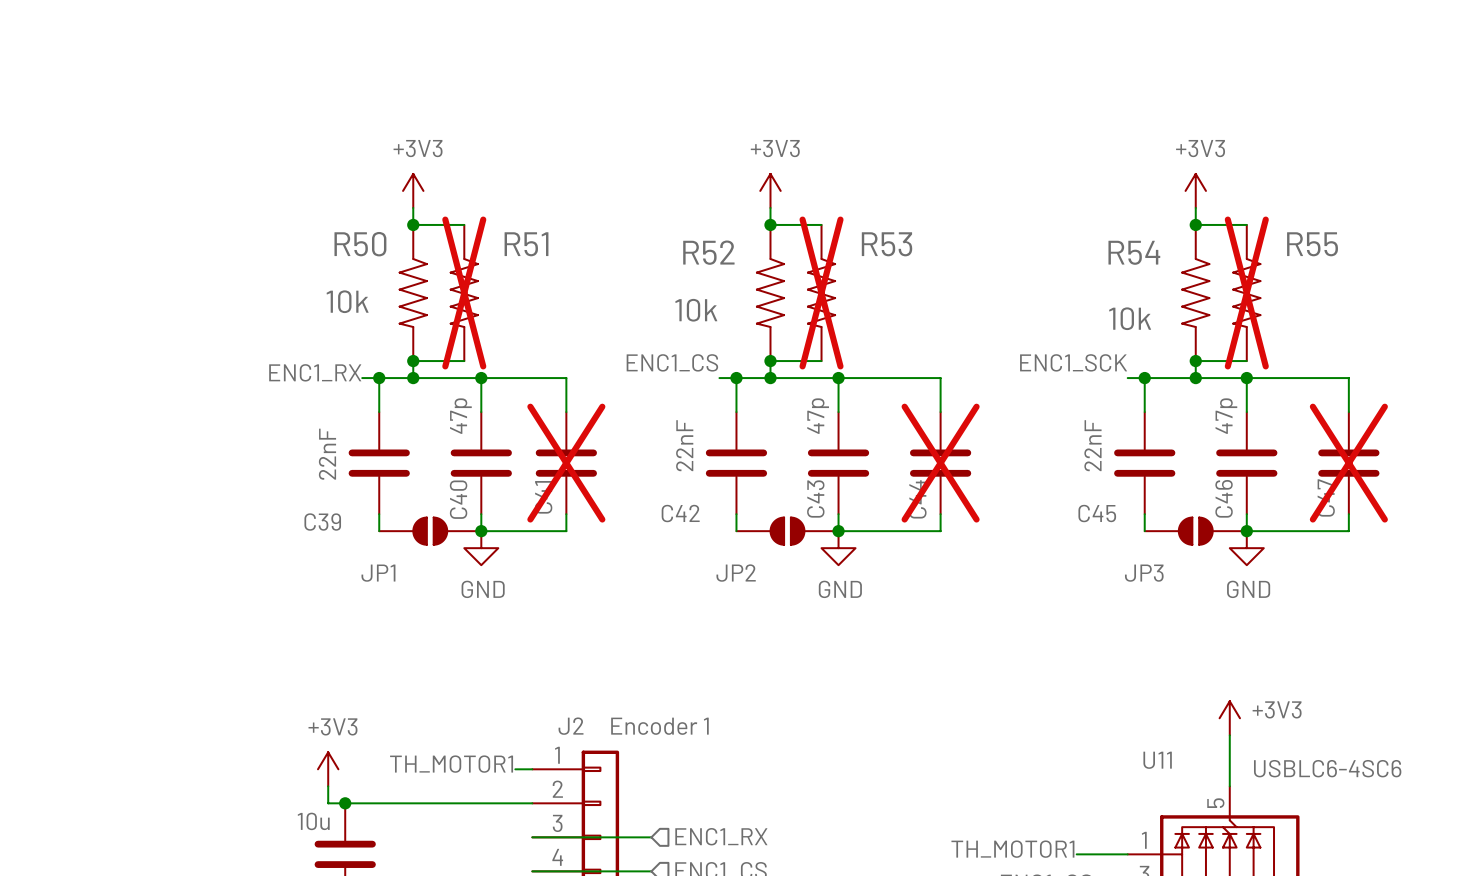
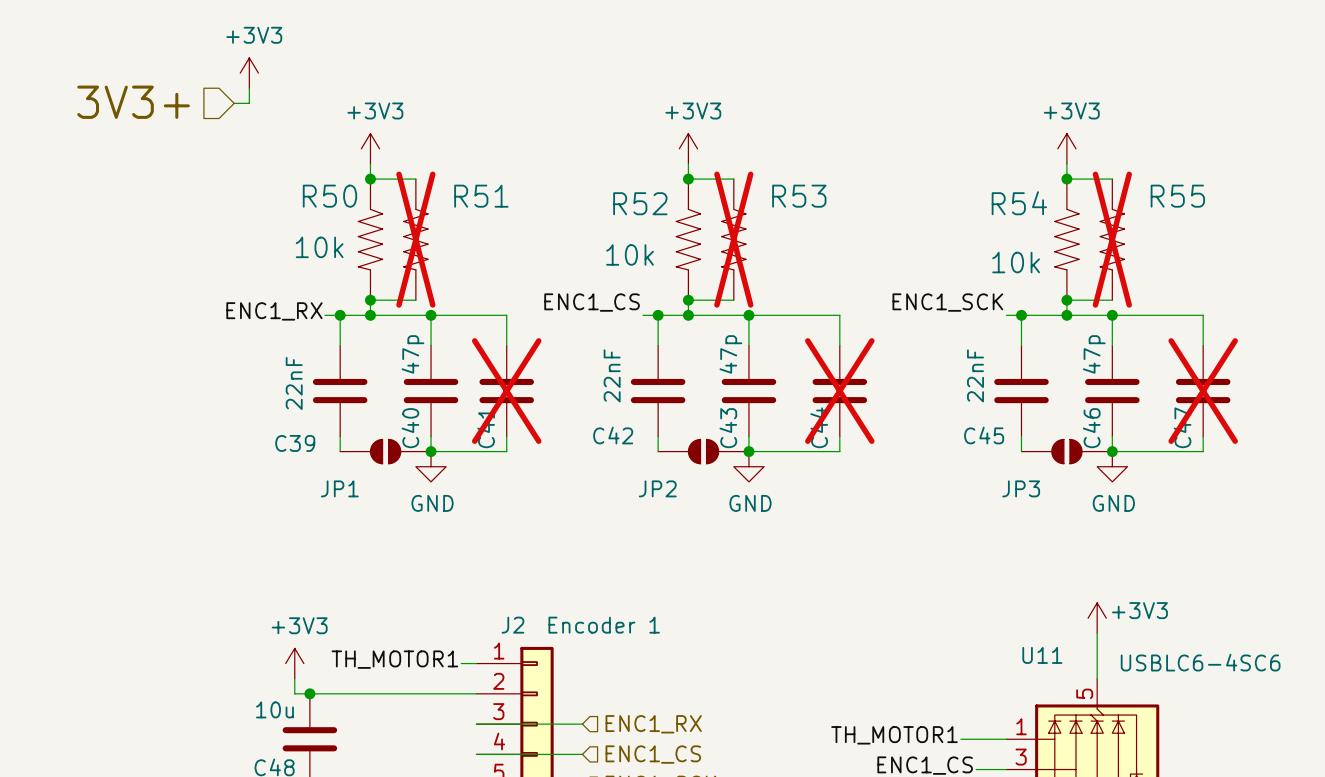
power symbol: none -> +3V3 (249, 73)
wire: none -> (249, 88) (249, 103) (234, 103)
hierarchical label: none -> 3V3+ (133, 102)

